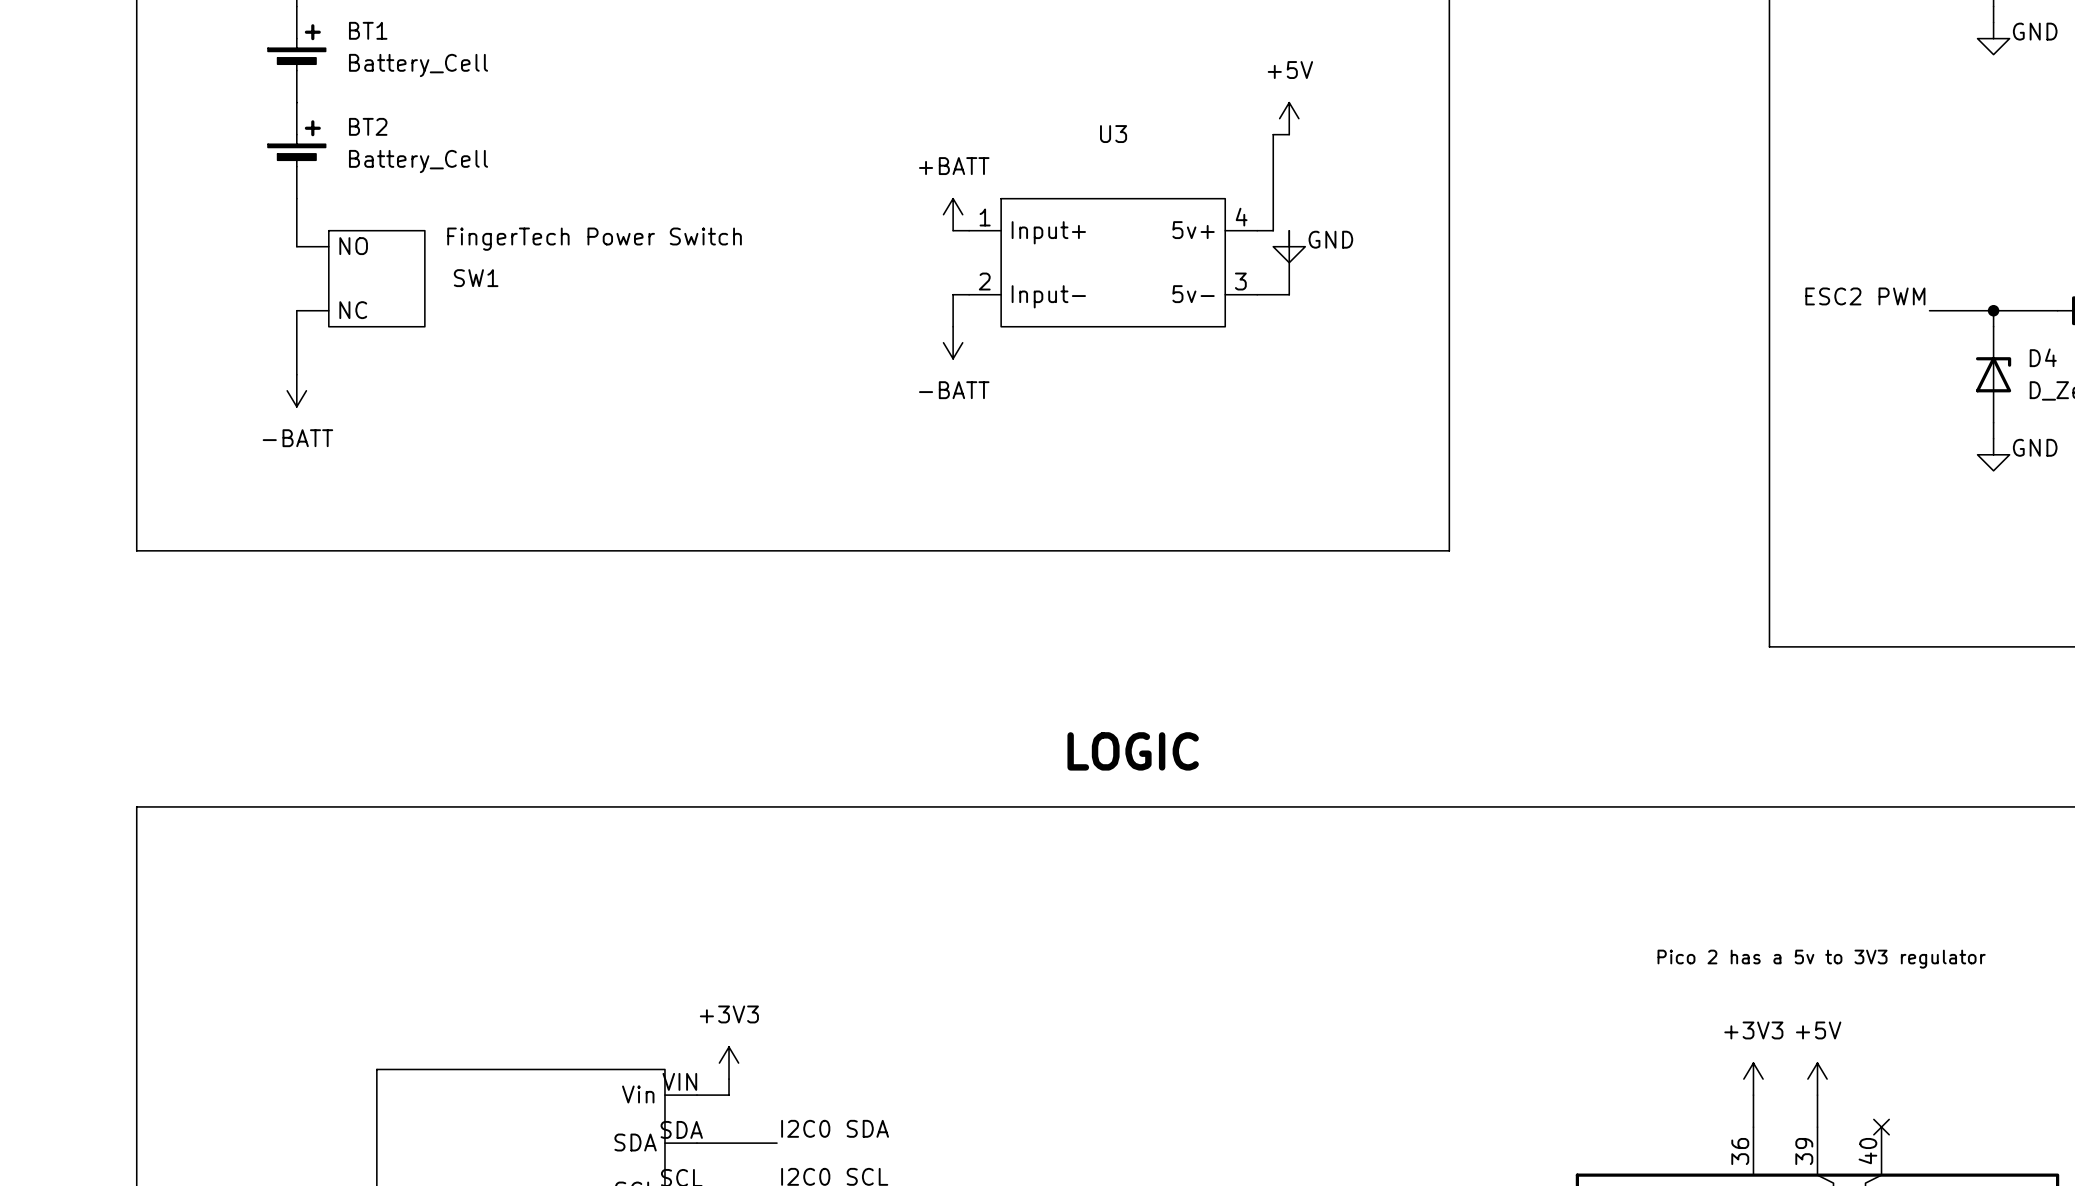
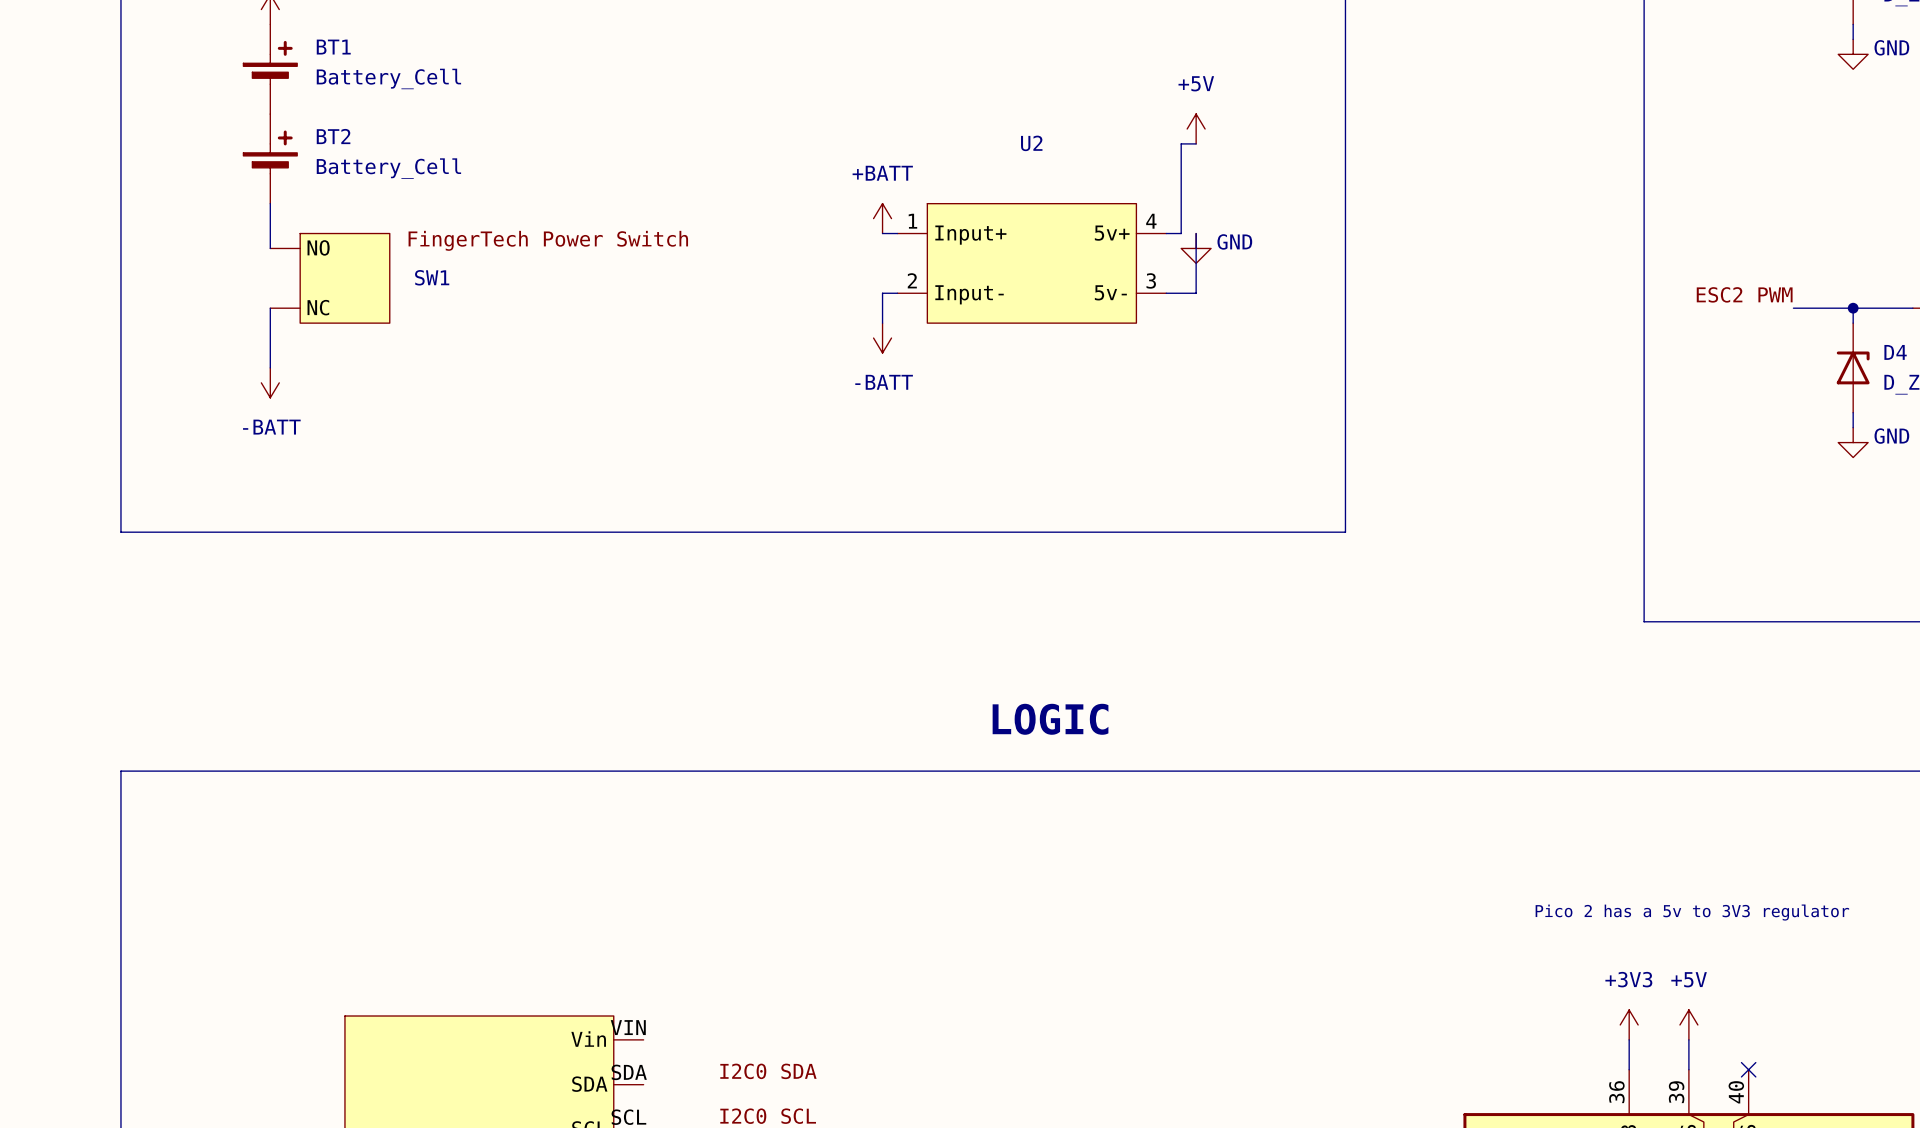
U3 name: U3 (1113, 134) -> U2 (1031, 143)
power symbol: +3V3 (729, 1063) -> none
wire: (729, 1079) (729, 1095) (696, 1095) -> none
wire: (696, 1143) (777, 1143) -> none

